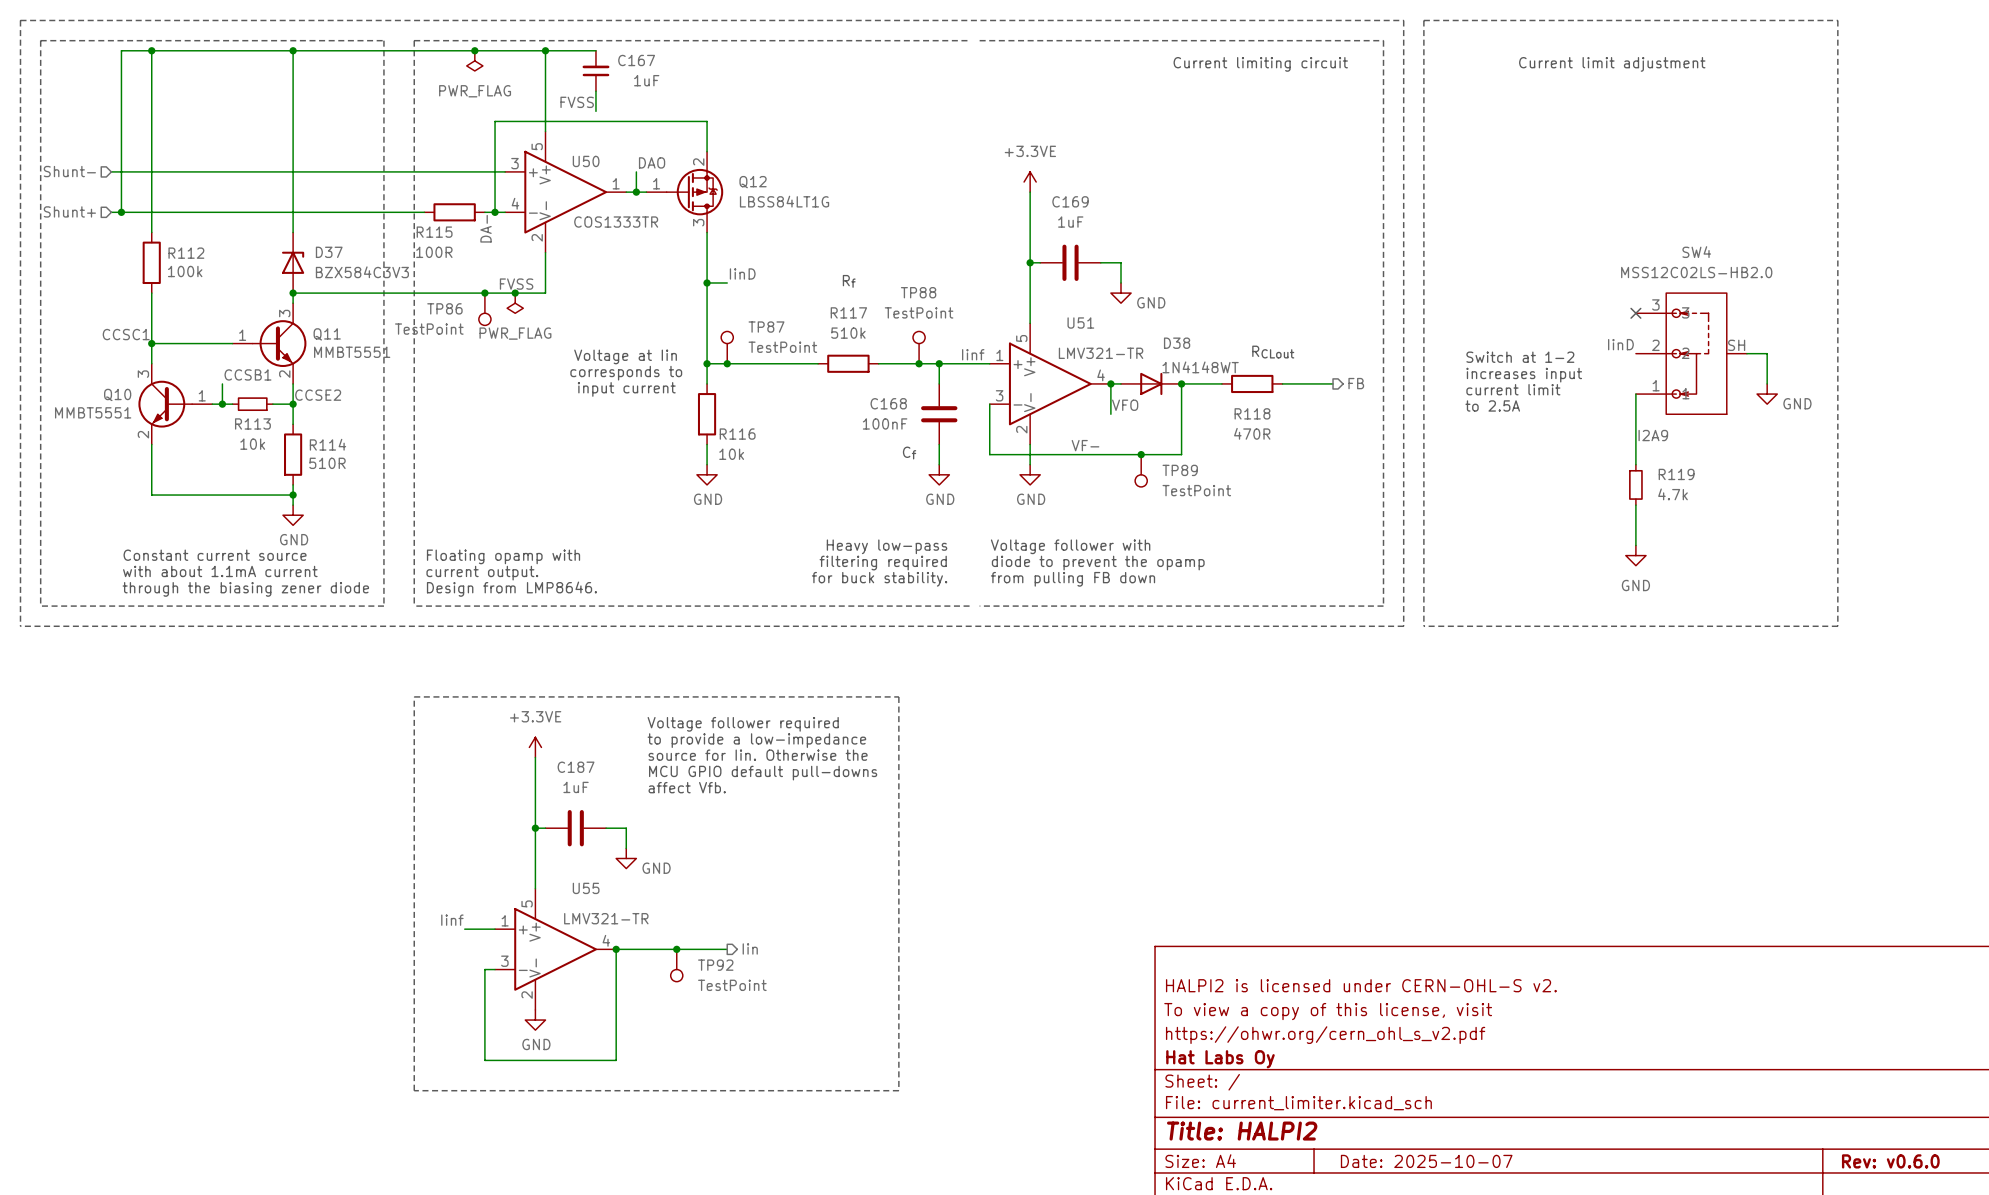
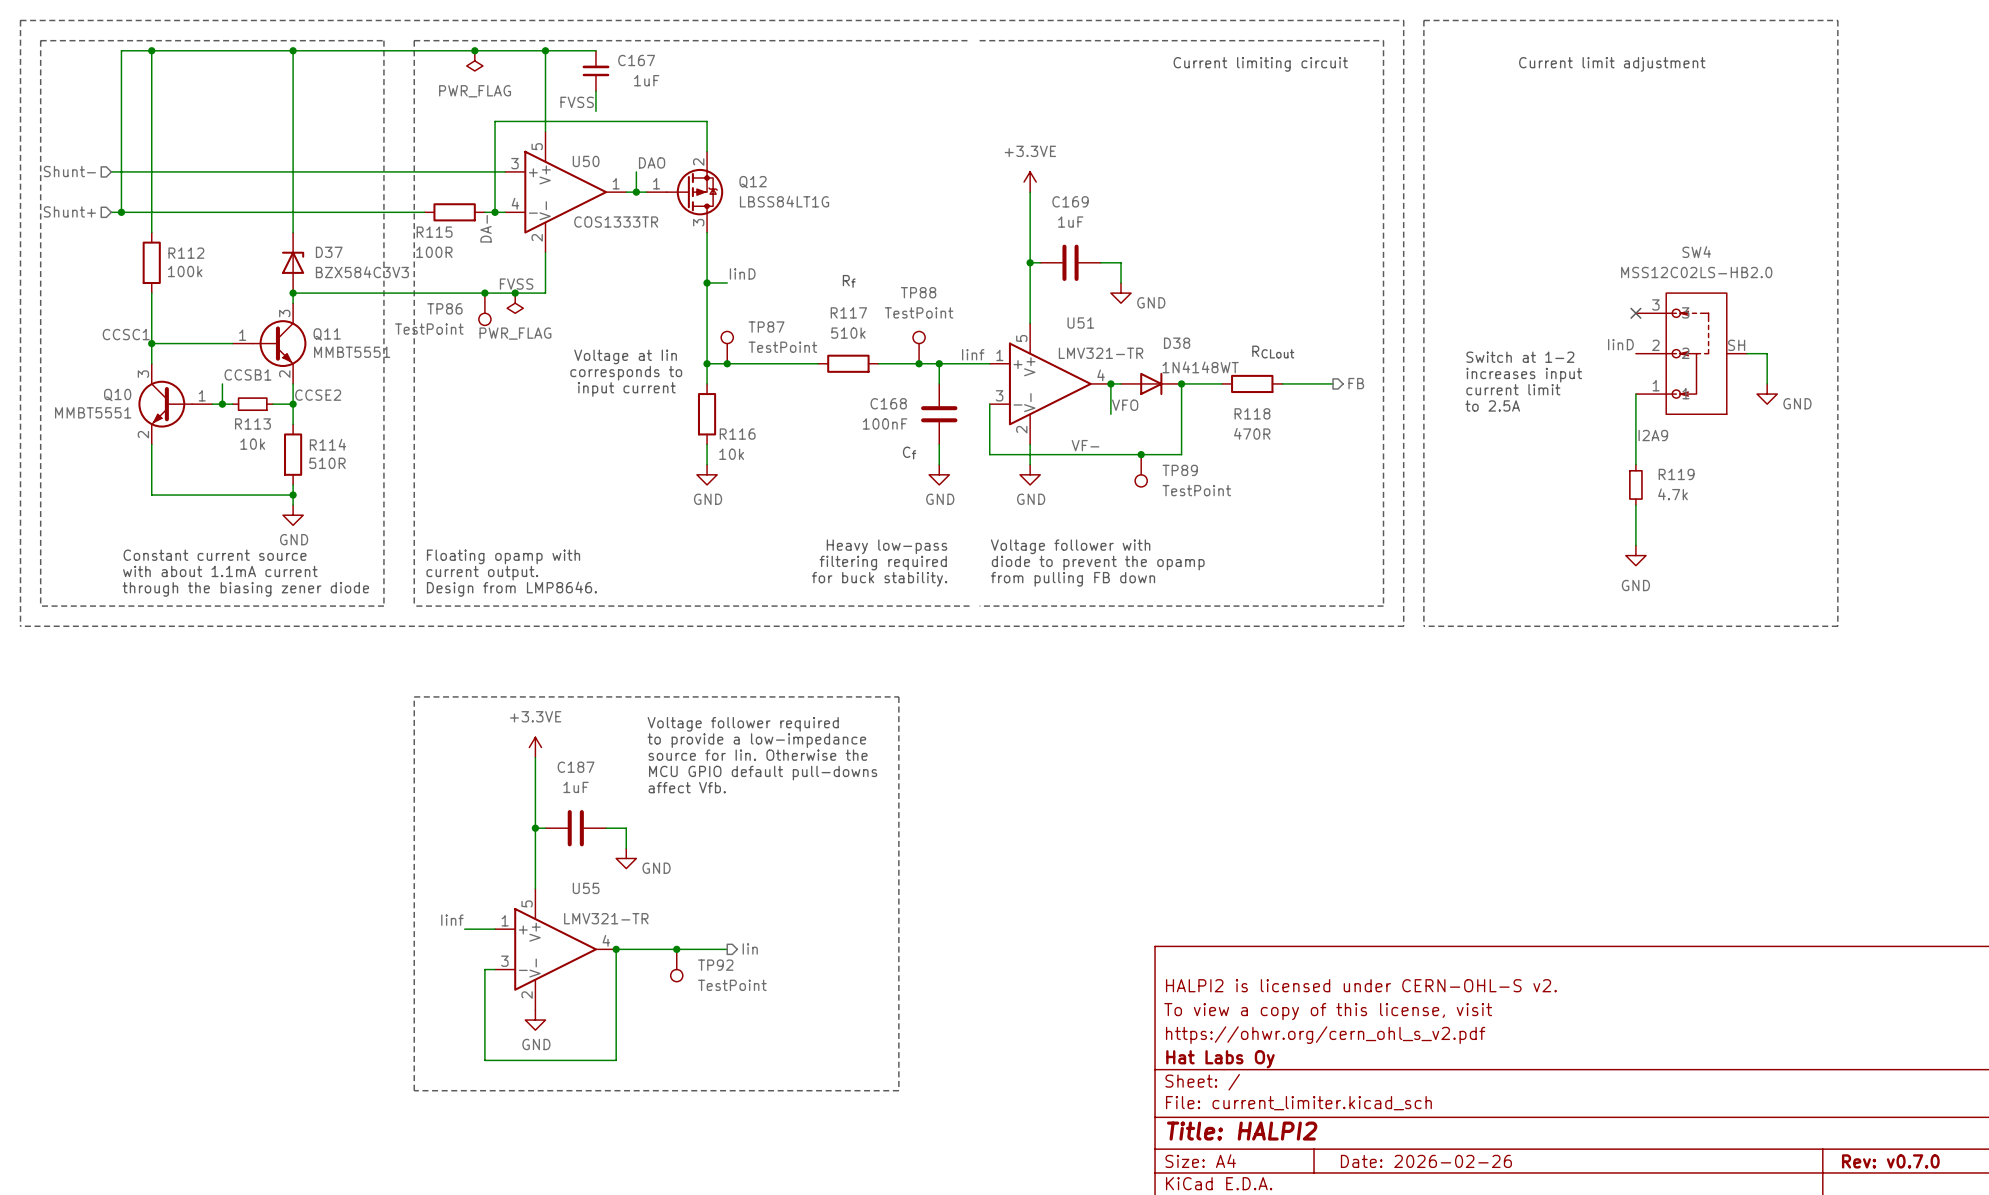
title block: Date: 2025-10-07 (1426, 1161) -> Date: 2026-02-26 (1426, 1161)
title block: Rev: v0.6.0 (1890, 1161) -> Rev: v0.7.0 (1890, 1161)

